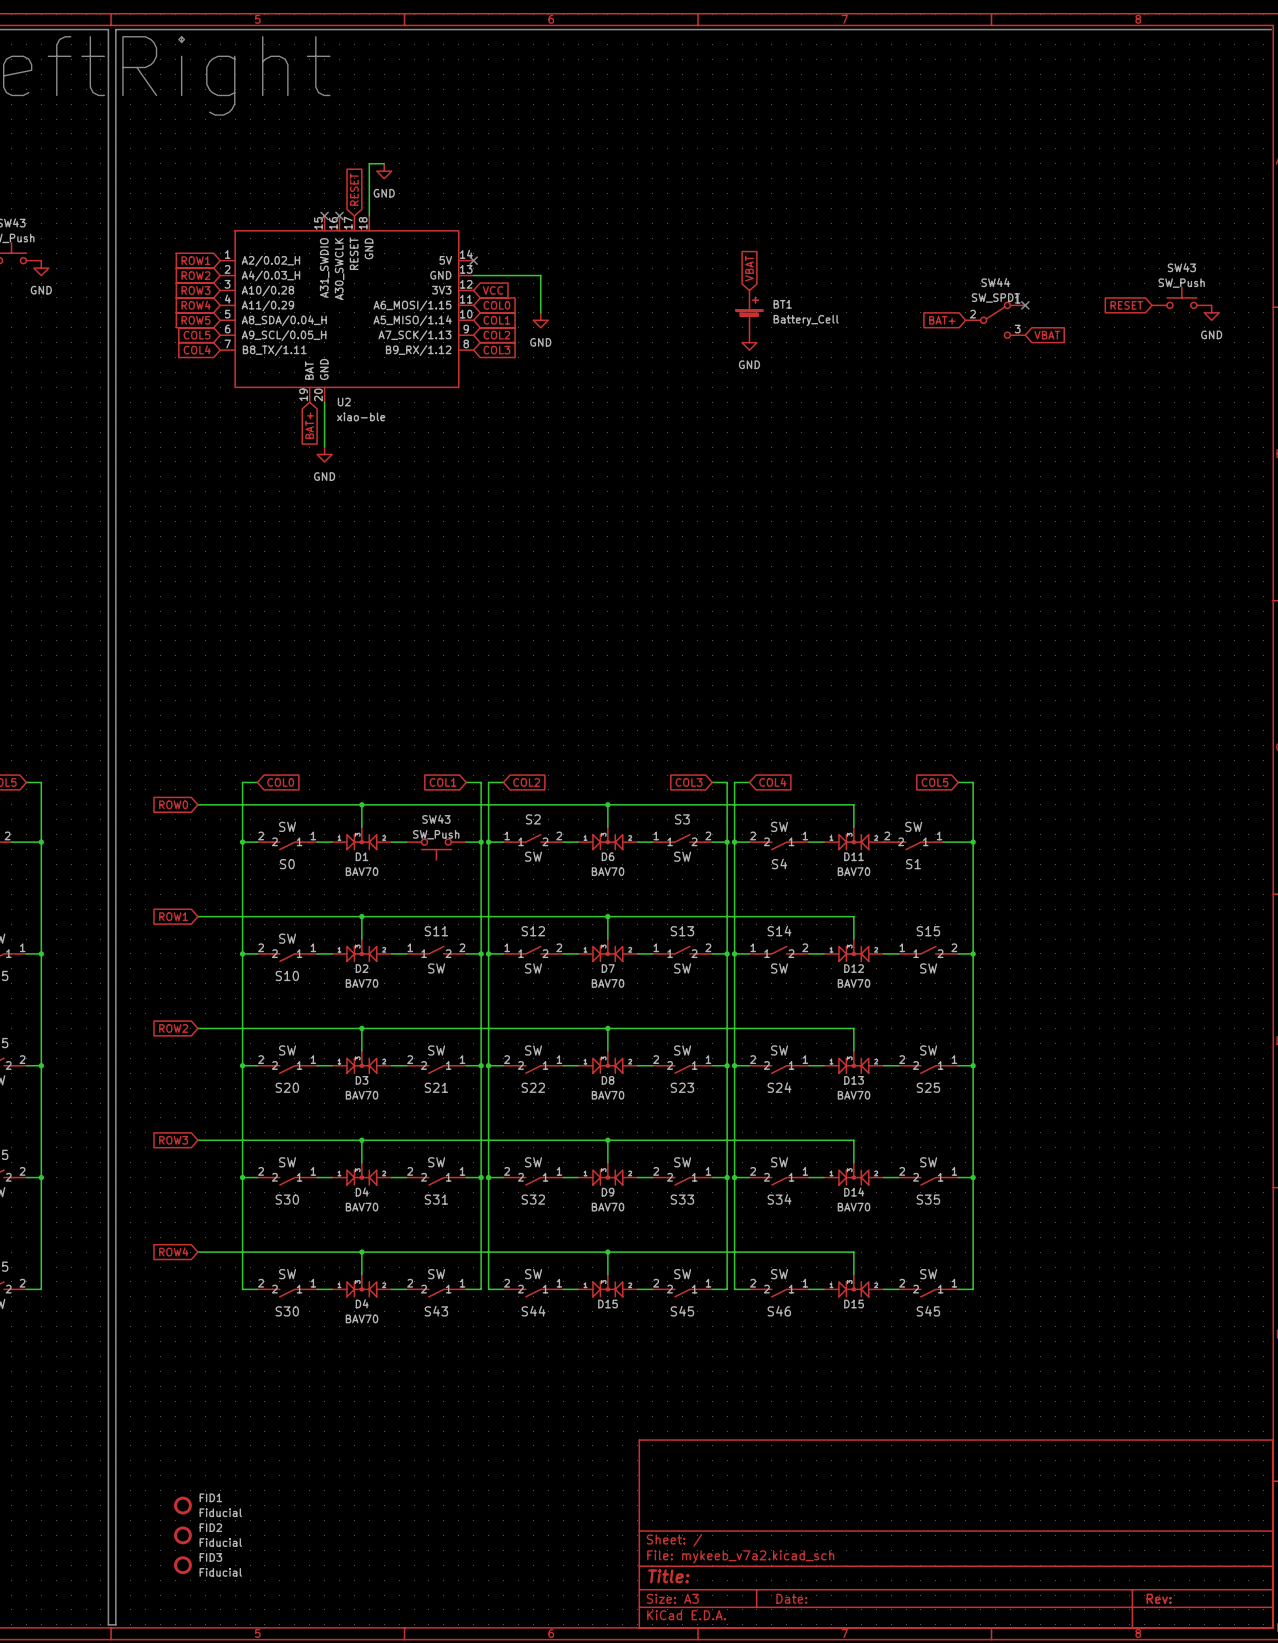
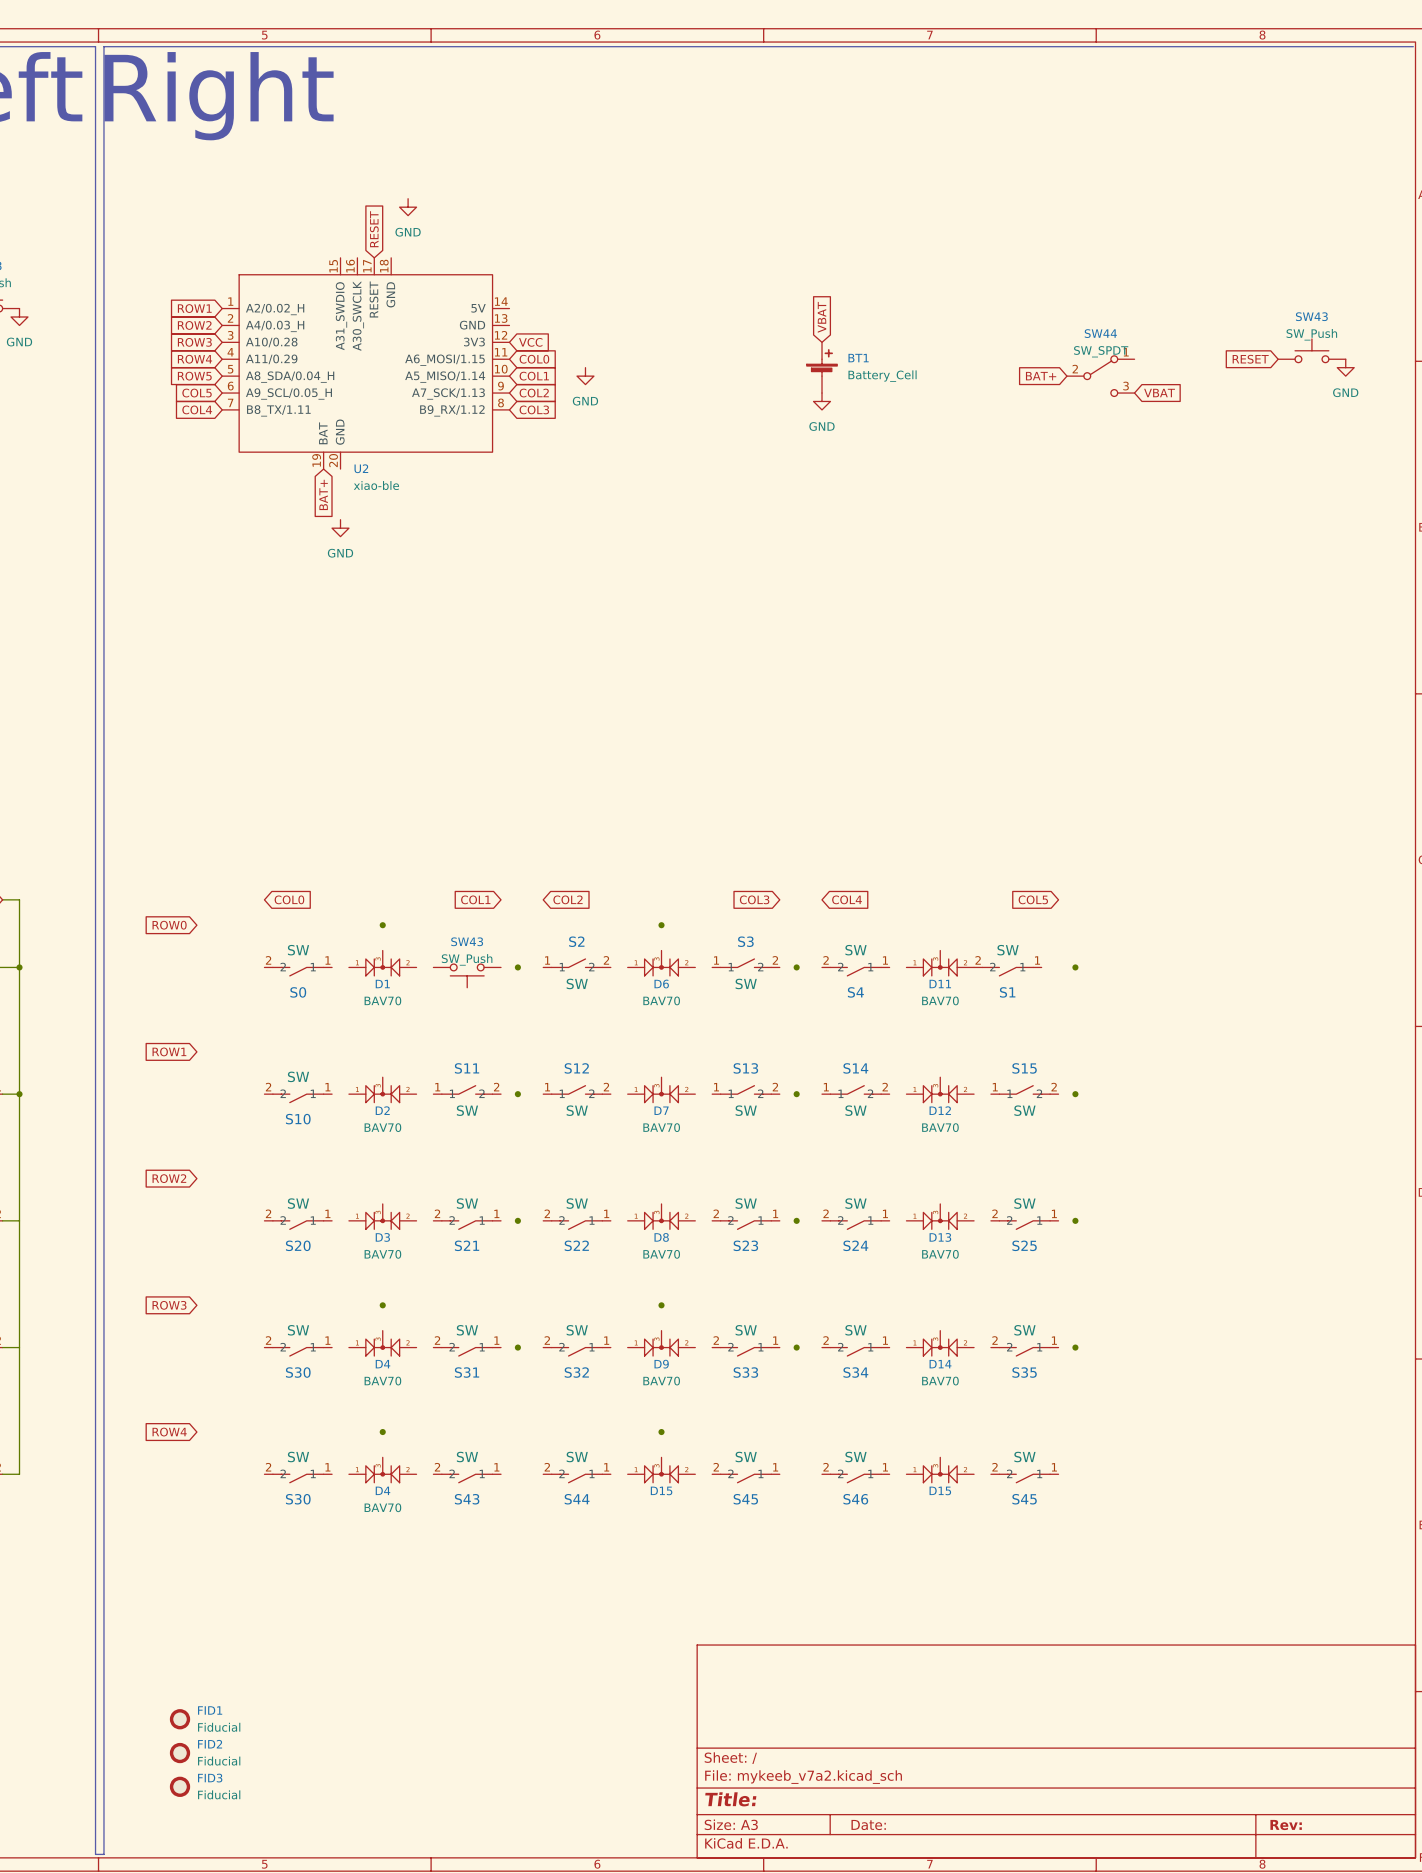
wire: (384, 163) (369, 163) (369, 215) -> none
no-connect mark: (324, 215) -> none
no-connect mark: (339, 215) -> none
no-connect mark: (473, 260) -> none
wire: (473, 275) (540, 275) (540, 312) -> none
no-connect mark: (1025, 305) -> none
wire: (324, 402) (324, 447) -> none
wire: (257, 782) (242, 782) (242, 1289) (257, 1289) -> none
wire: (466, 782) (481, 782) (481, 1289) (466, 1289) -> none
wire: (503, 782) (488, 782) (488, 1289) (503, 1289) -> none
wire: (712, 782) (727, 782) (727, 1289) (712, 1289) -> none
wire: (749, 782) (734, 782) (734, 1289) (749, 1289) -> none
wire: (958, 782) (973, 782) (973, 1289) (958, 1289) -> none
wire: (197, 804) (853, 804) (853, 827) -> none
wire: (361, 804) (361, 827) -> none
wire: (607, 804) (607, 827) -> none
wire: (242, 842) (257, 842) -> none
junction: (242, 842) -> none
wire: (317, 842) (332, 842) -> none
wire: (391, 842) (406, 842) -> none
wire: (466, 842) (481, 842) -> none
wire: (488, 842) (503, 842) -> none
junction: (488, 842) -> none
wire: (563, 842) (578, 842) -> none
wire: (637, 842) (652, 842) -> none
wire: (712, 842) (727, 842) -> none
wire: (734, 842) (749, 842) -> none
junction: (734, 842) -> none
wire: (809, 842) (824, 842) -> none
wire: (943, 842) (973, 842) -> none
wire: (197, 916) (853, 916) (853, 939) -> none
wire: (361, 916) (361, 939) -> none
junction: (361, 916) -> none
wire: (607, 916) (607, 939) -> none
junction: (607, 916) -> none
wire: (242, 953) (257, 953) -> none
junction: (242, 953) -> none
wire: (317, 953) (332, 953) -> none
wire: (391, 953) (406, 953) -> none
wire: (466, 953) (481, 953) -> none
wire: (488, 953) (503, 953) -> none
junction: (488, 953) -> none
wire: (563, 953) (578, 953) -> none
wire: (637, 953) (652, 953) -> none
wire: (712, 953) (727, 953) -> none
wire: (734, 953) (749, 953) -> none
junction: (734, 953) -> none
wire: (809, 953) (824, 953) -> none
wire: (883, 953) (898, 953) -> none
wire: (958, 953) (973, 953) -> none
wire: (197, 1028) (853, 1028) (853, 1050) -> none
wire: (361, 1028) (361, 1050) -> none
junction: (361, 1028) -> none
wire: (607, 1028) (607, 1050) -> none
junction: (607, 1028) -> none
junction: (41, 1065) -> none
wire: (242, 1065) (257, 1065) -> none
junction: (242, 1065) -> none
wire: (317, 1065) (332, 1065) -> none
wire: (391, 1065) (406, 1065) -> none
wire: (466, 1065) (481, 1065) -> none
wire: (488, 1065) (503, 1065) -> none
junction: (488, 1065) -> none
wire: (563, 1065) (578, 1065) -> none
wire: (637, 1065) (652, 1065) -> none
wire: (712, 1065) (727, 1065) -> none
wire: (734, 1065) (749, 1065) -> none
junction: (734, 1065) -> none
wire: (809, 1065) (824, 1065) -> none
wire: (883, 1065) (898, 1065) -> none
wire: (958, 1065) (973, 1065) -> none
wire: (197, 1140) (853, 1140) (853, 1162) -> none
wire: (361, 1140) (361, 1162) -> none
wire: (607, 1140) (607, 1162) -> none
junction: (41, 1177) -> none
wire: (242, 1177) (257, 1177) -> none
junction: (242, 1177) -> none
wire: (317, 1177) (332, 1177) -> none
wire: (391, 1177) (406, 1177) -> none
wire: (466, 1177) (481, 1177) -> none
wire: (488, 1177) (503, 1177) -> none
junction: (488, 1177) -> none
wire: (563, 1177) (578, 1177) -> none
wire: (637, 1177) (652, 1177) -> none
wire: (712, 1177) (727, 1177) -> none
wire: (734, 1177) (749, 1177) -> none
junction: (734, 1177) -> none
wire: (809, 1177) (824, 1177) -> none
wire: (883, 1177) (898, 1177) -> none
wire: (958, 1177) (973, 1177) -> none
wire: (197, 1252) (853, 1252) (853, 1274) -> none
wire: (361, 1252) (361, 1274) -> none
wire: (607, 1252) (607, 1274) -> none
wire: (317, 1289) (332, 1289) -> none
wire: (391, 1289) (406, 1289) -> none
wire: (563, 1289) (578, 1289) -> none
wire: (637, 1289) (652, 1289) -> none
wire: (809, 1289) (824, 1289) -> none
wire: (883, 1289) (898, 1289) -> none

